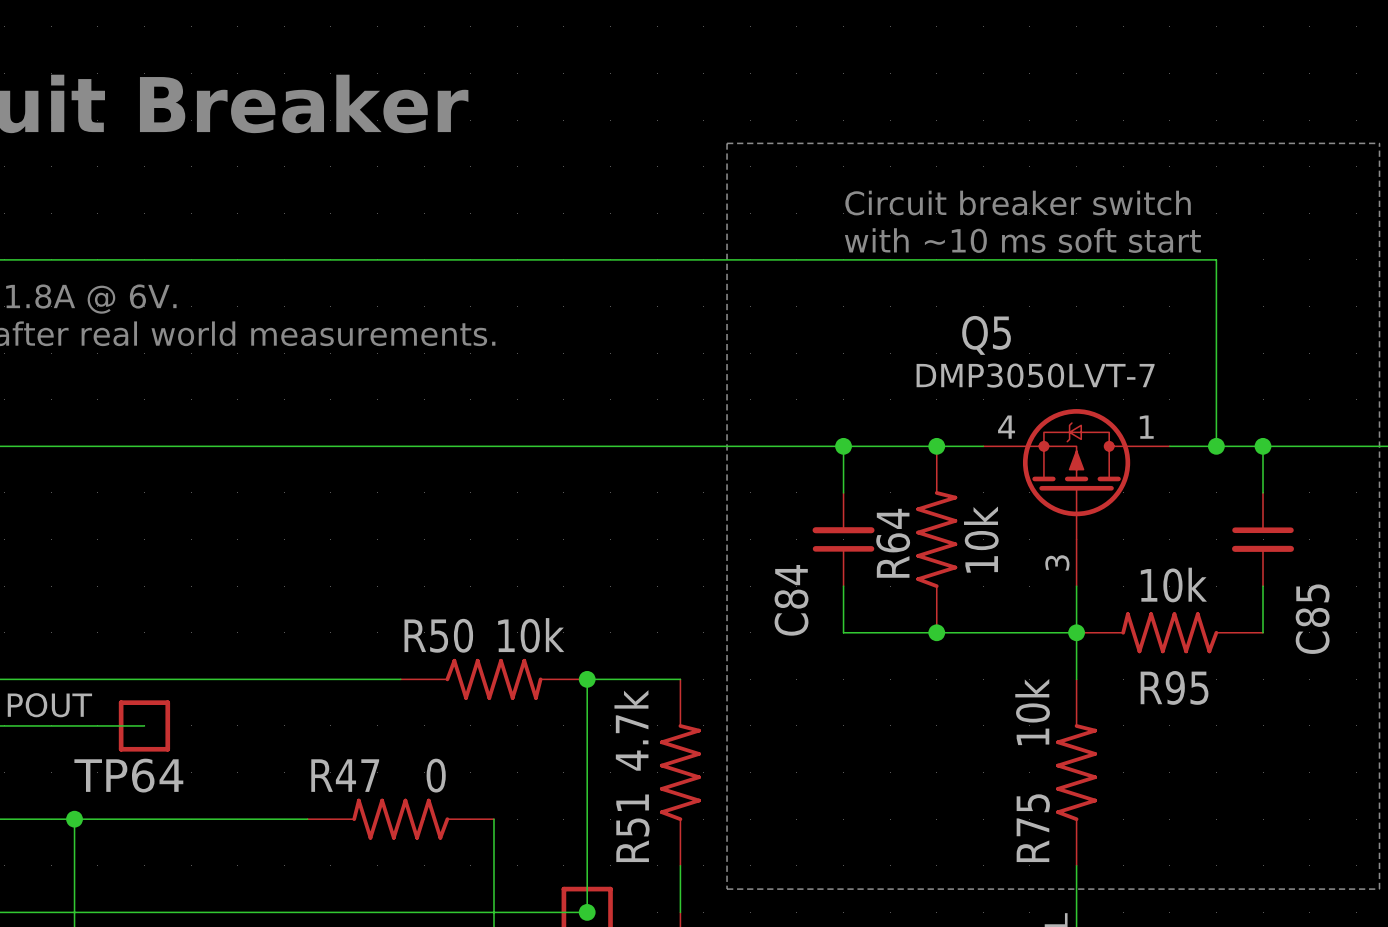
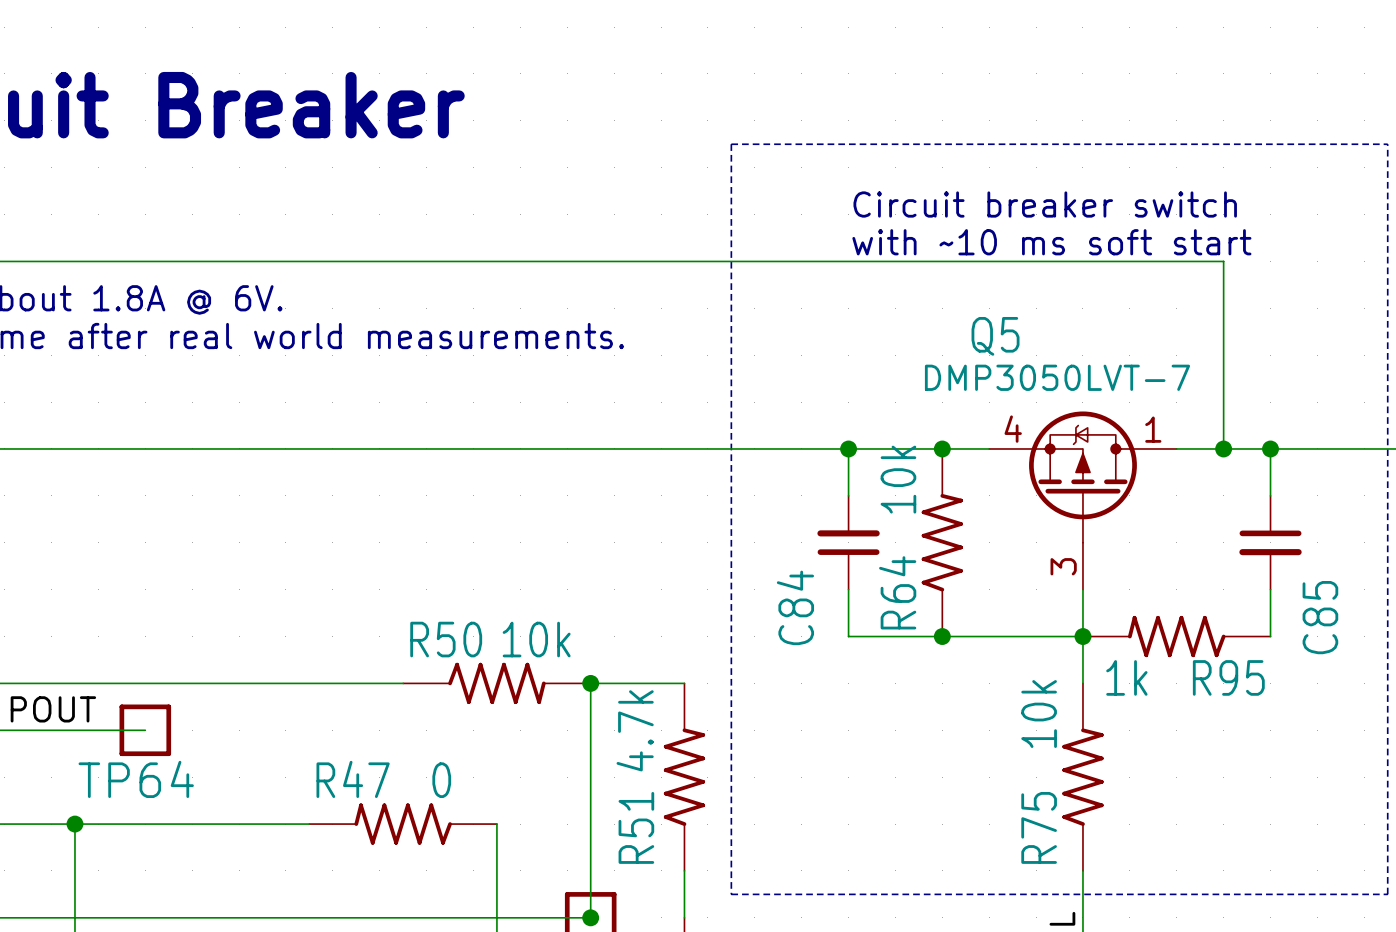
R64 value position: 10k (981, 539) -> 10k (898, 479)
R64 name position: R64 (893, 543) -> R64 (897, 592)
R95 value: 10k (1173, 585) -> 1k (1126, 677)
R95 name position: R95 (1174, 687) -> R95 (1228, 677)

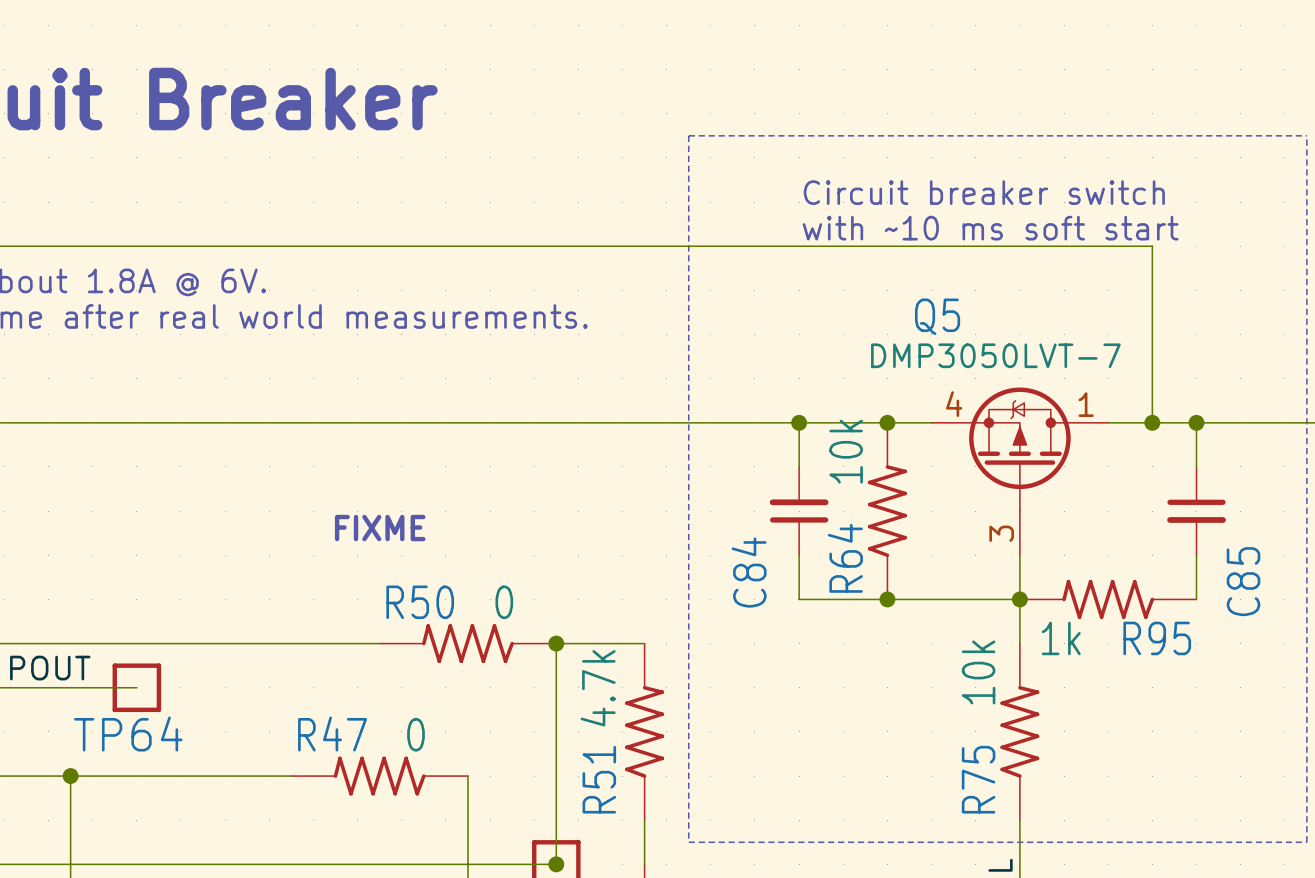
text: none -> FIXME (380, 528)
R50 value: 10k (536, 639) -> 0 (504, 602)
R50 rotation: 0° (496, 683) -> 180° (467, 643)

